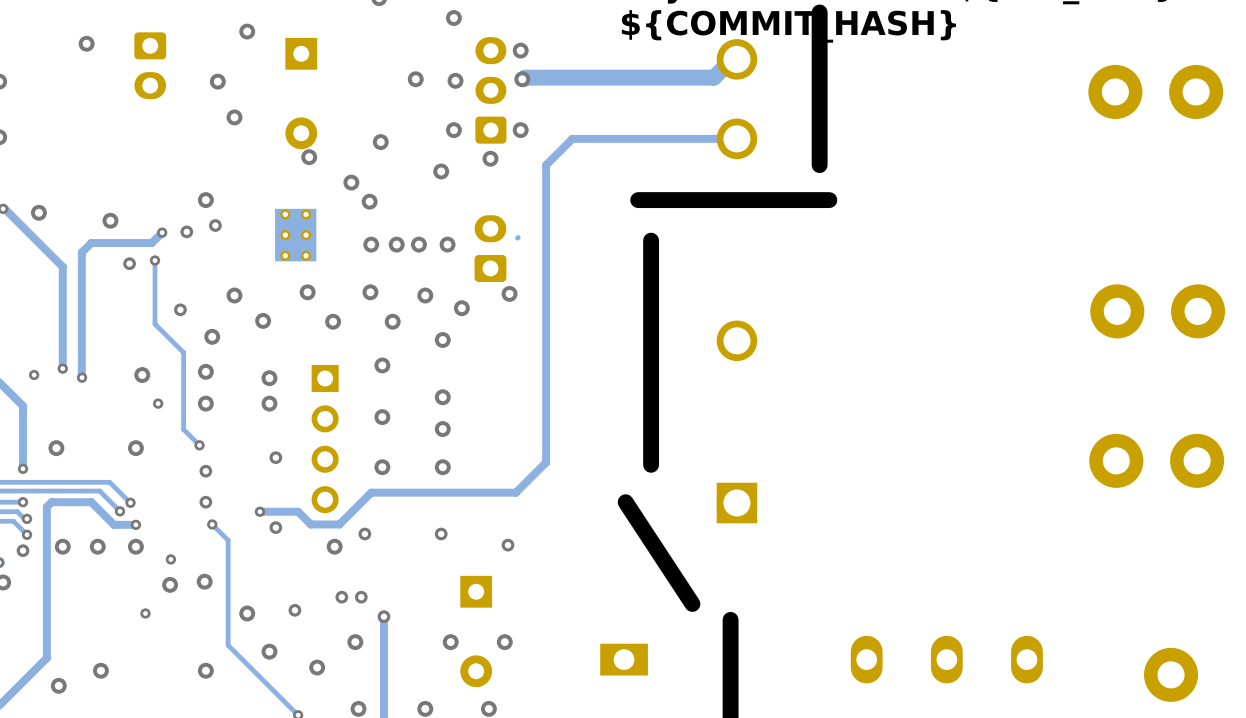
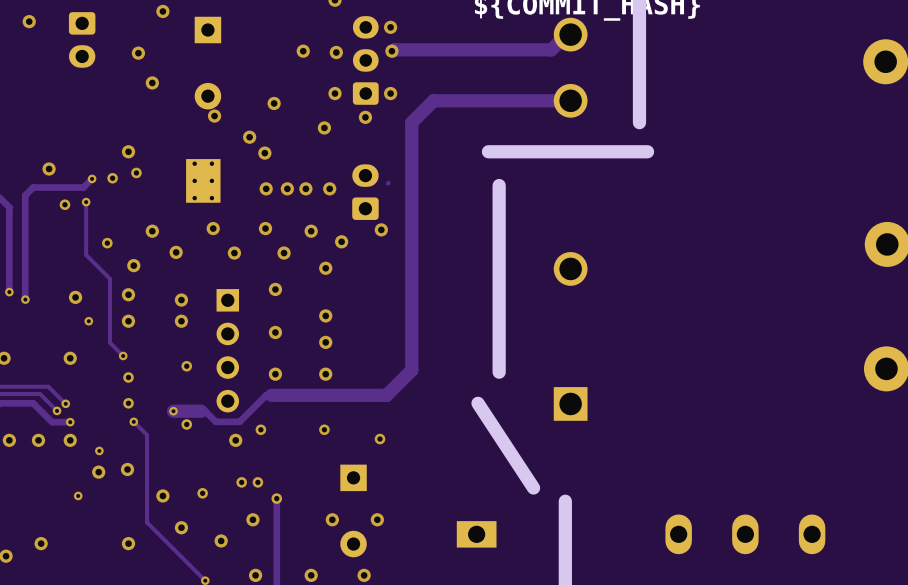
track width: thin (736, 138) (572, 138) (546, 165) (546, 462) (515, 492) (377, 492) -> thick (570, 100) (433, 100) (411, 122) (411, 370) (386, 395) (271, 395)
track width: thin (293, 511) (259, 511) -> thick (201, 411) (173, 411)

